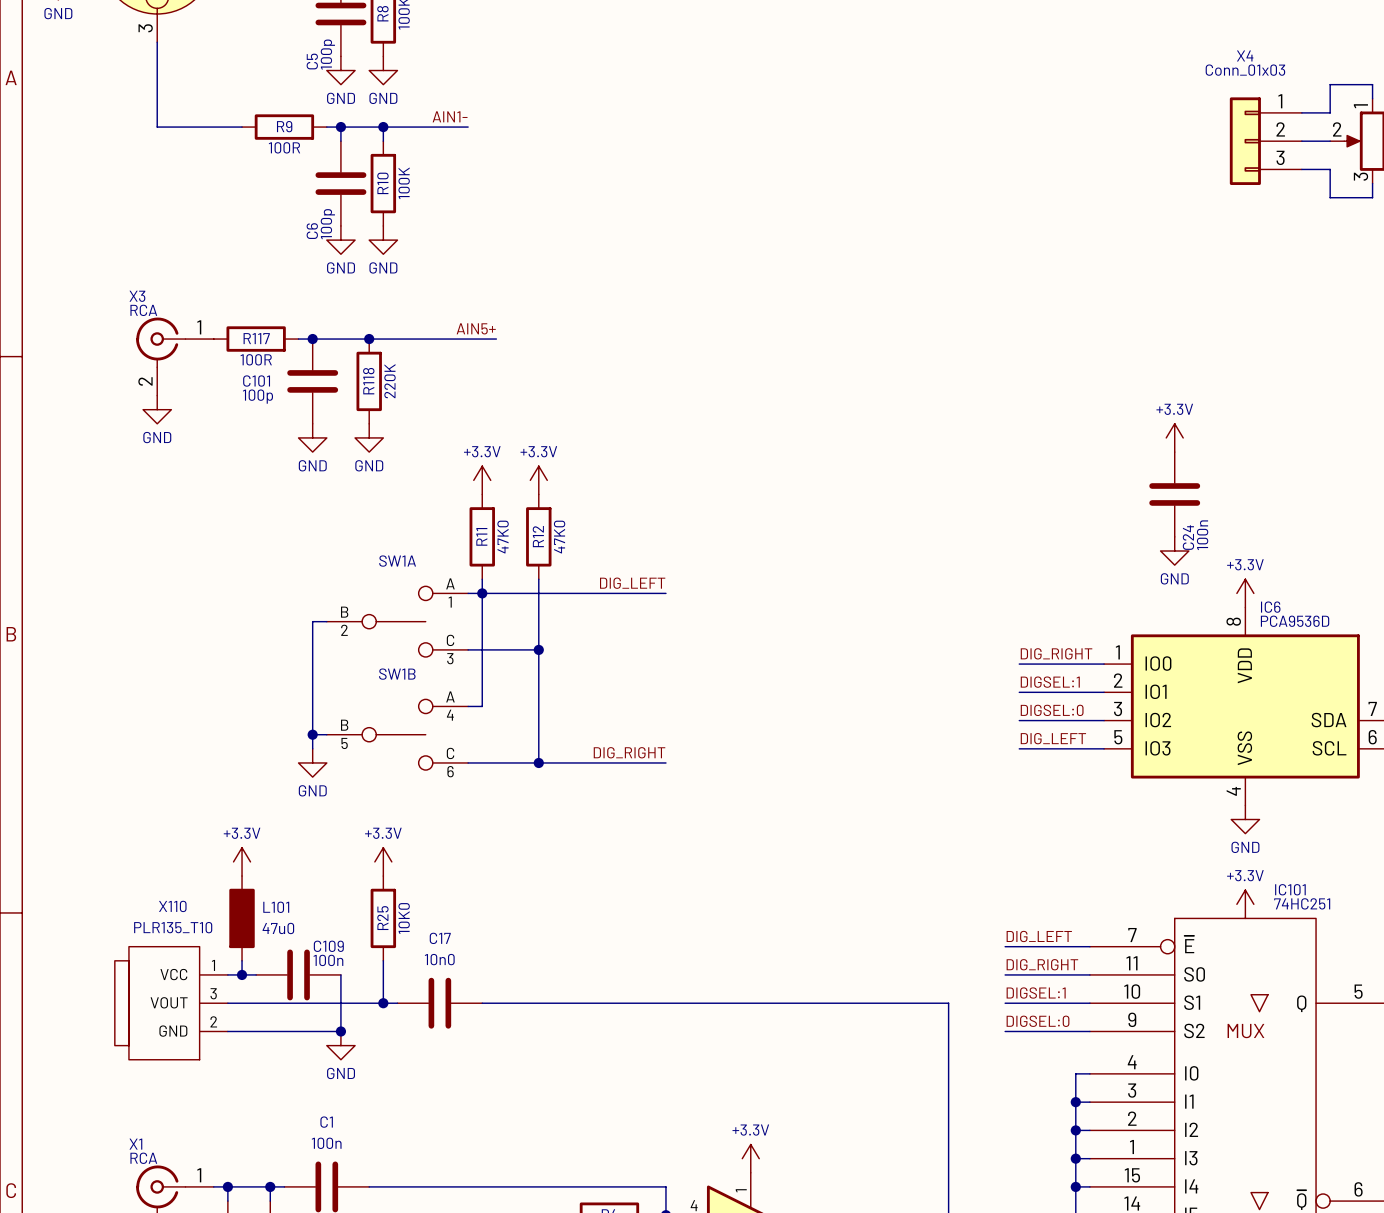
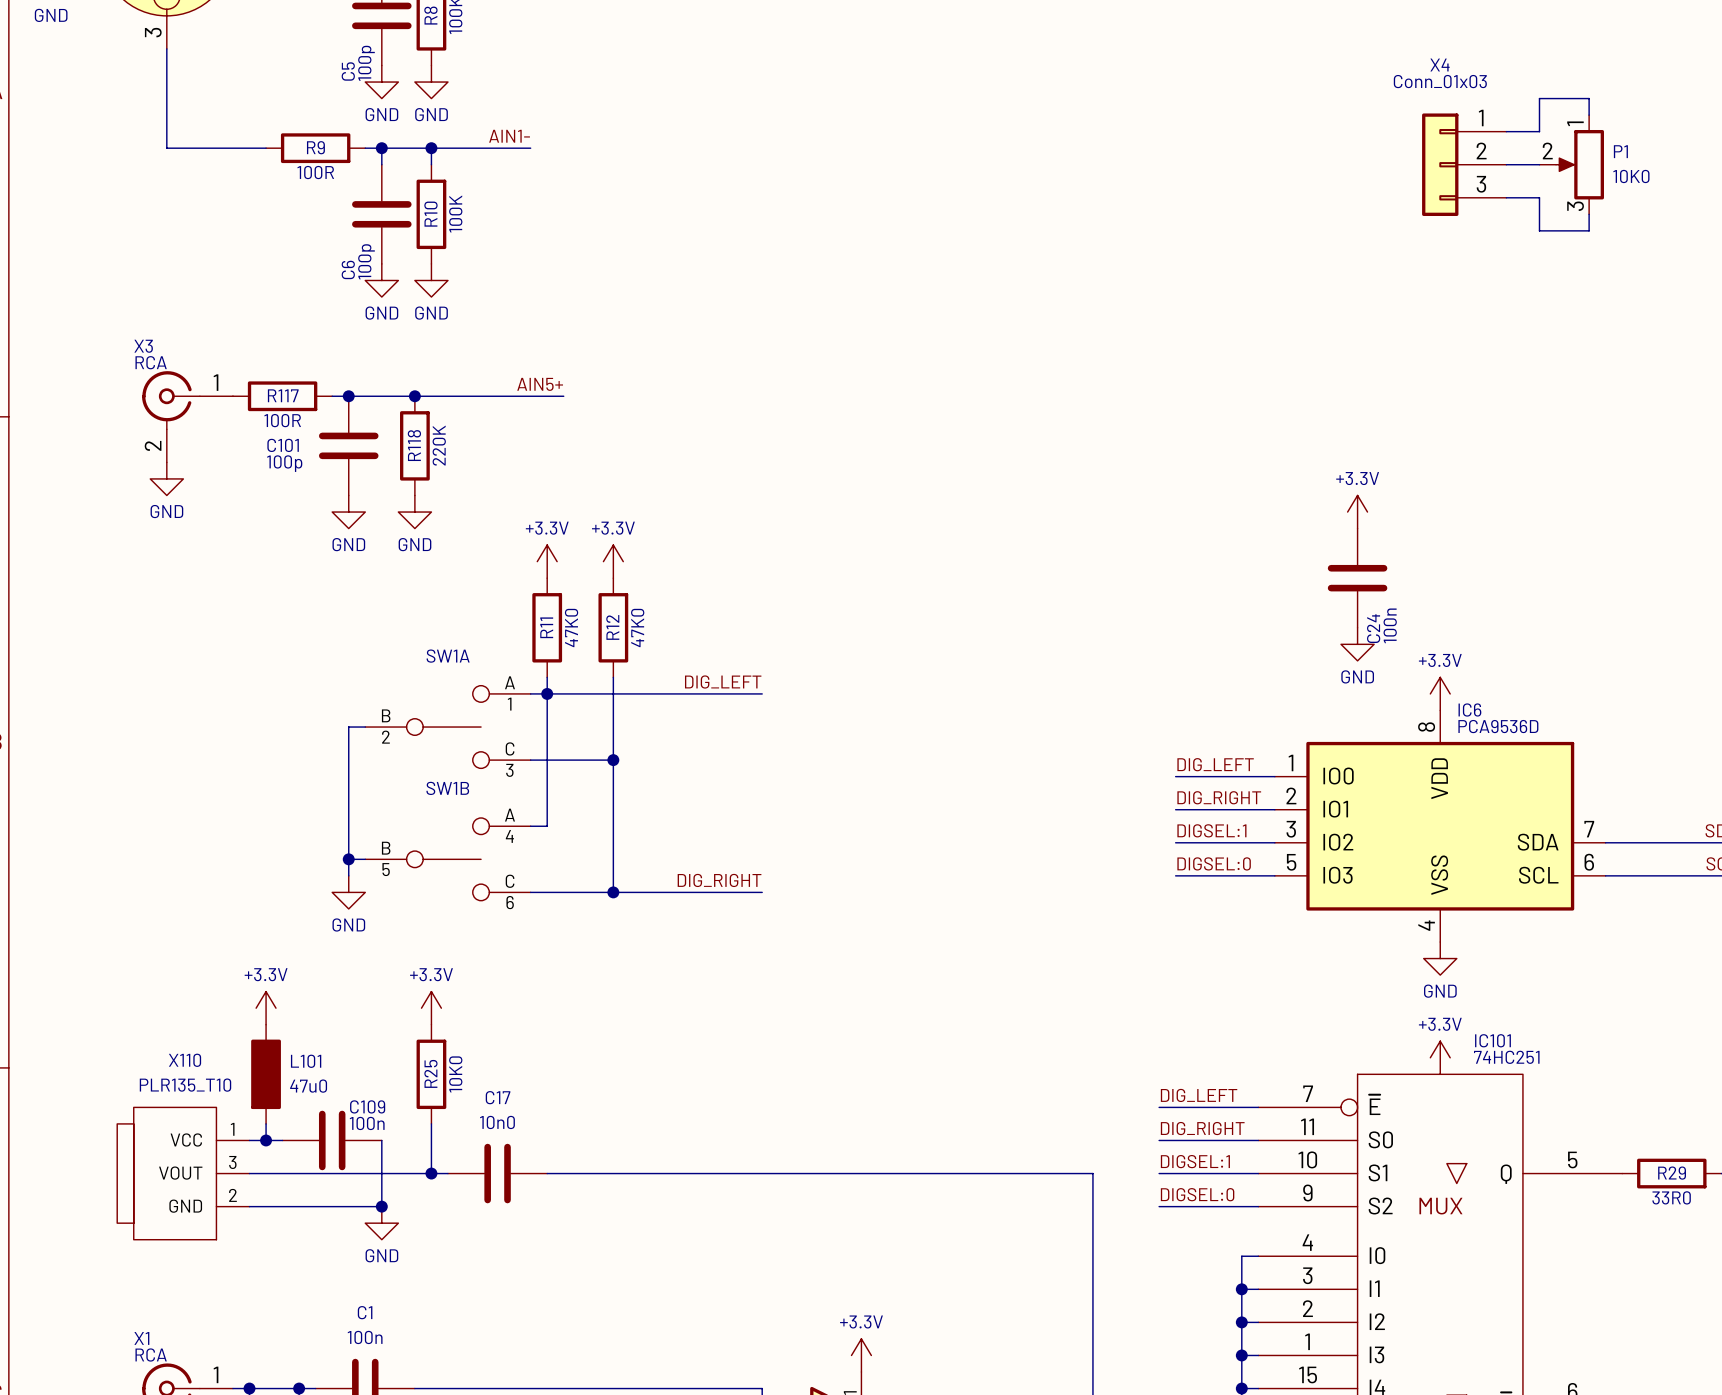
label: DIG_RIGHT (1056, 653) -> DIG_LEFT (1215, 764)
label: DIGSEL:1 (1050, 682) -> DIG_RIGHT (1219, 797)
label: DIGSEL:0 (1052, 710) -> DIGSEL:1 (1211, 830)
label: DIG_LEFT (1053, 738) -> DIGSEL:0 (1214, 863)

